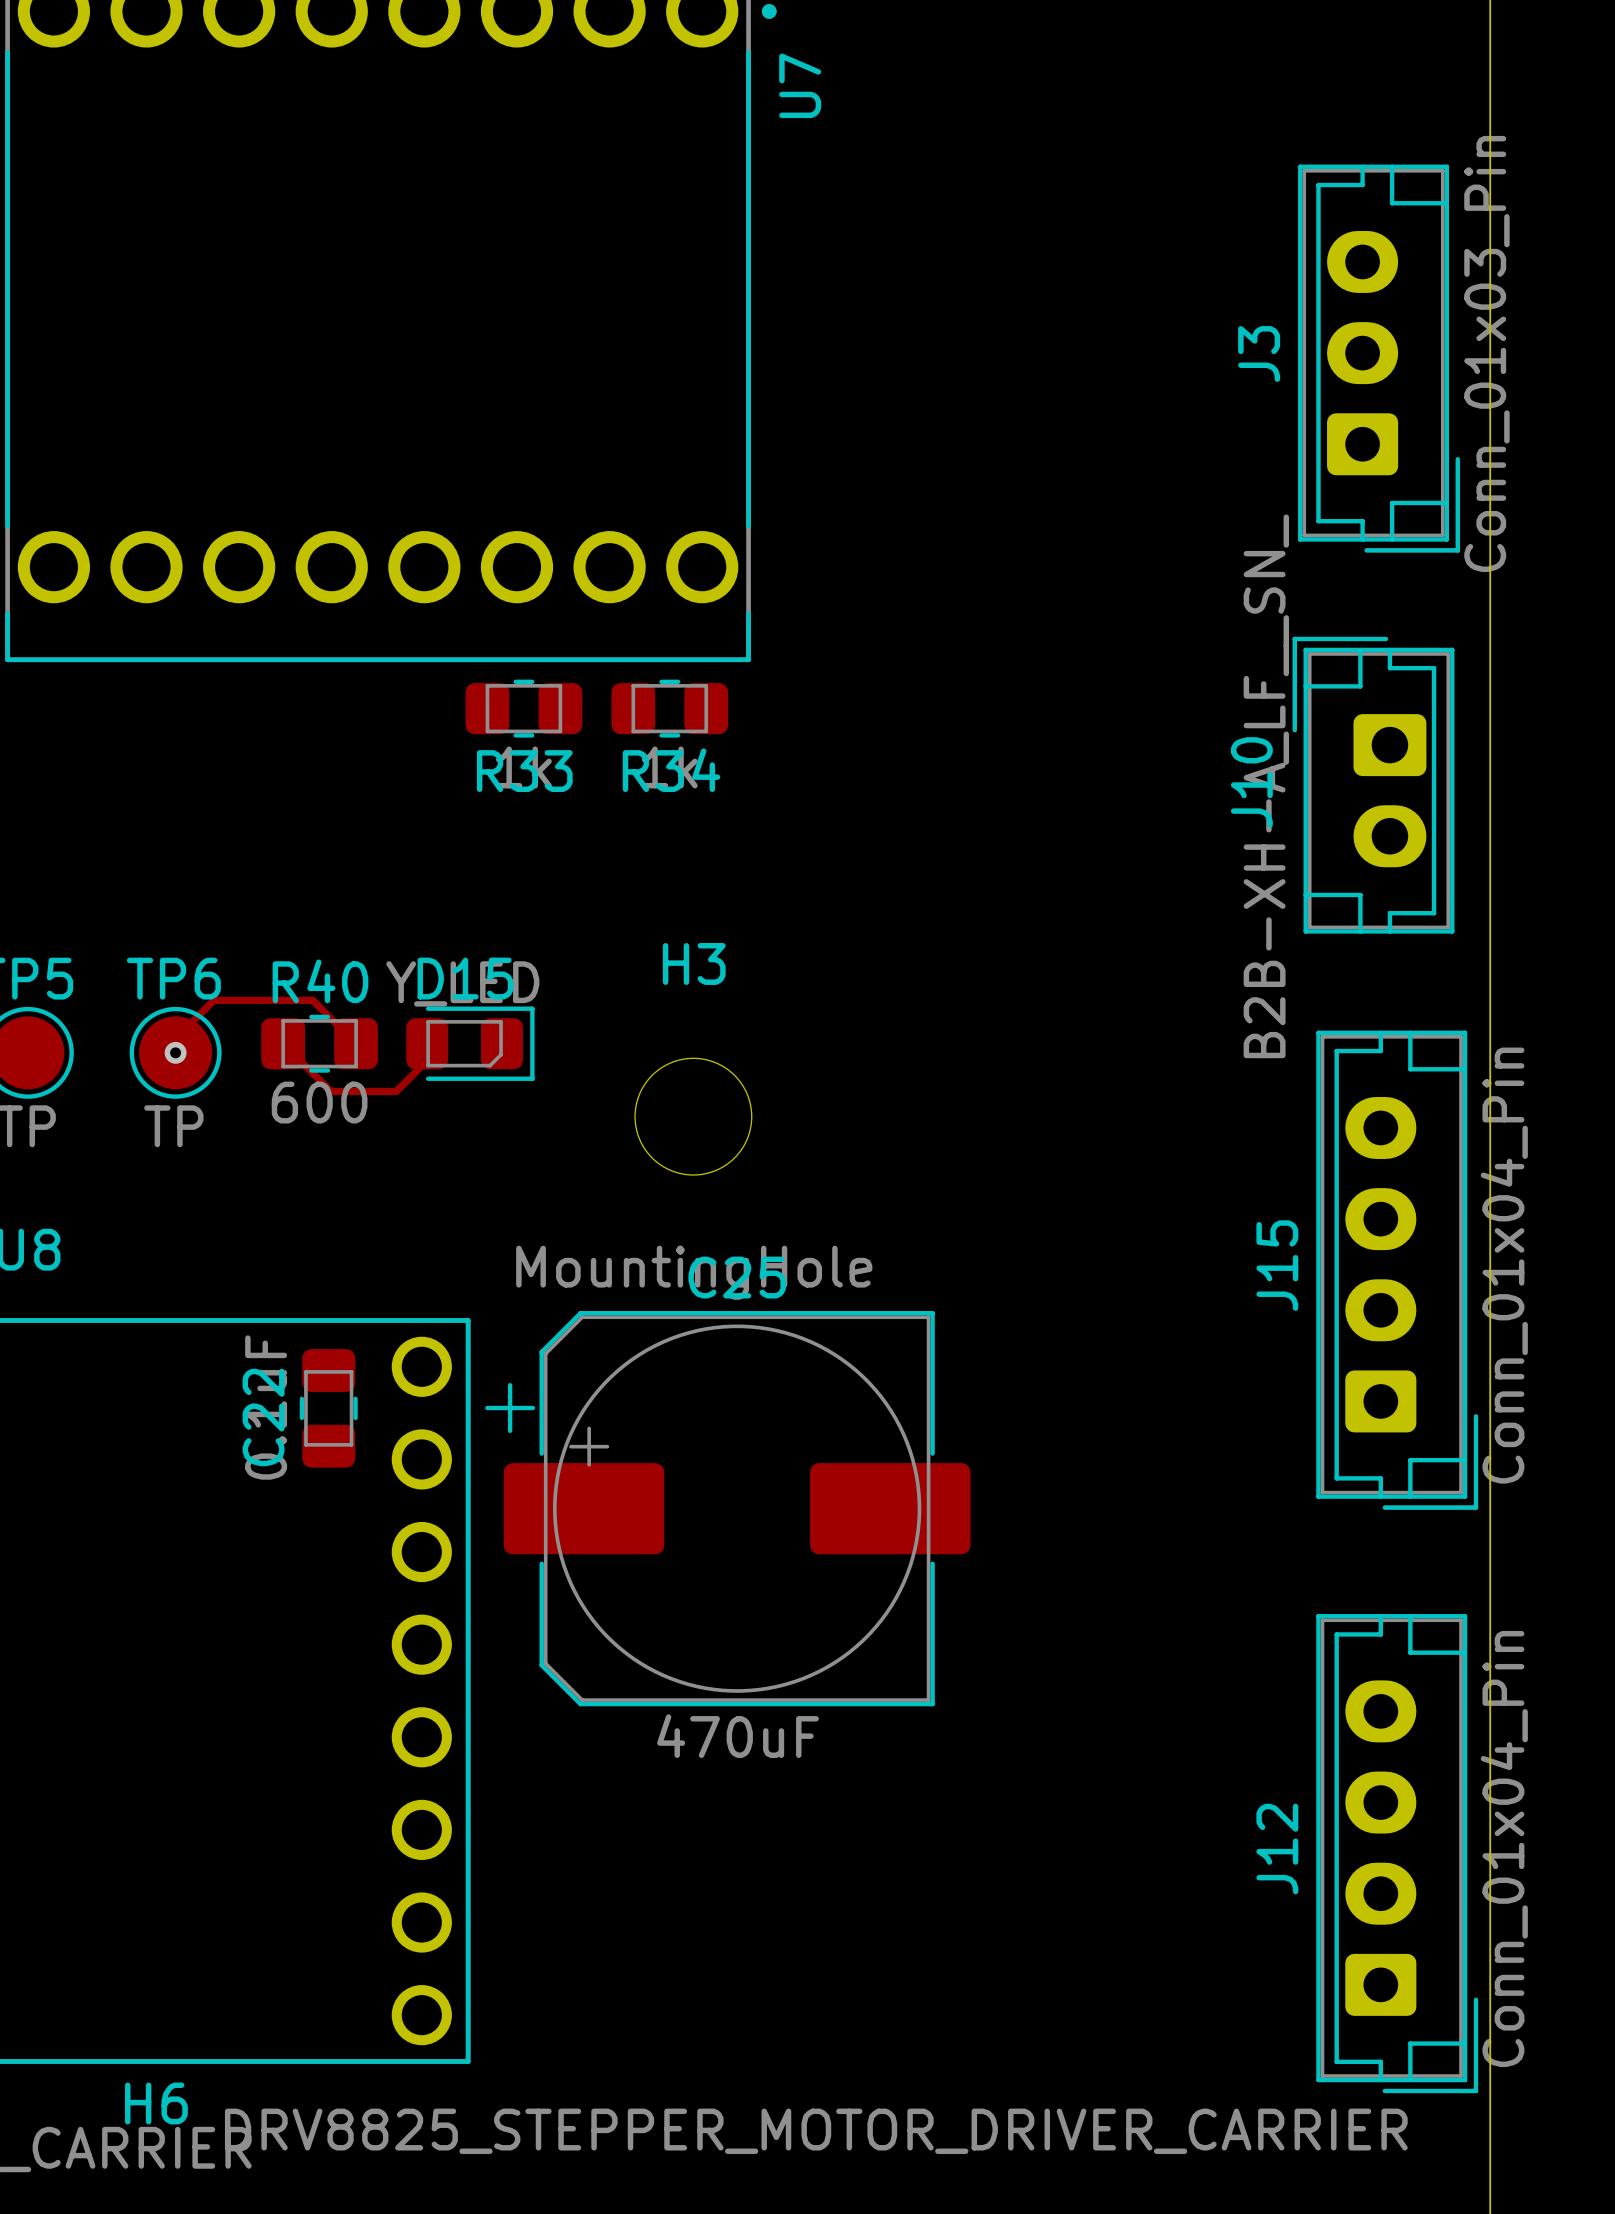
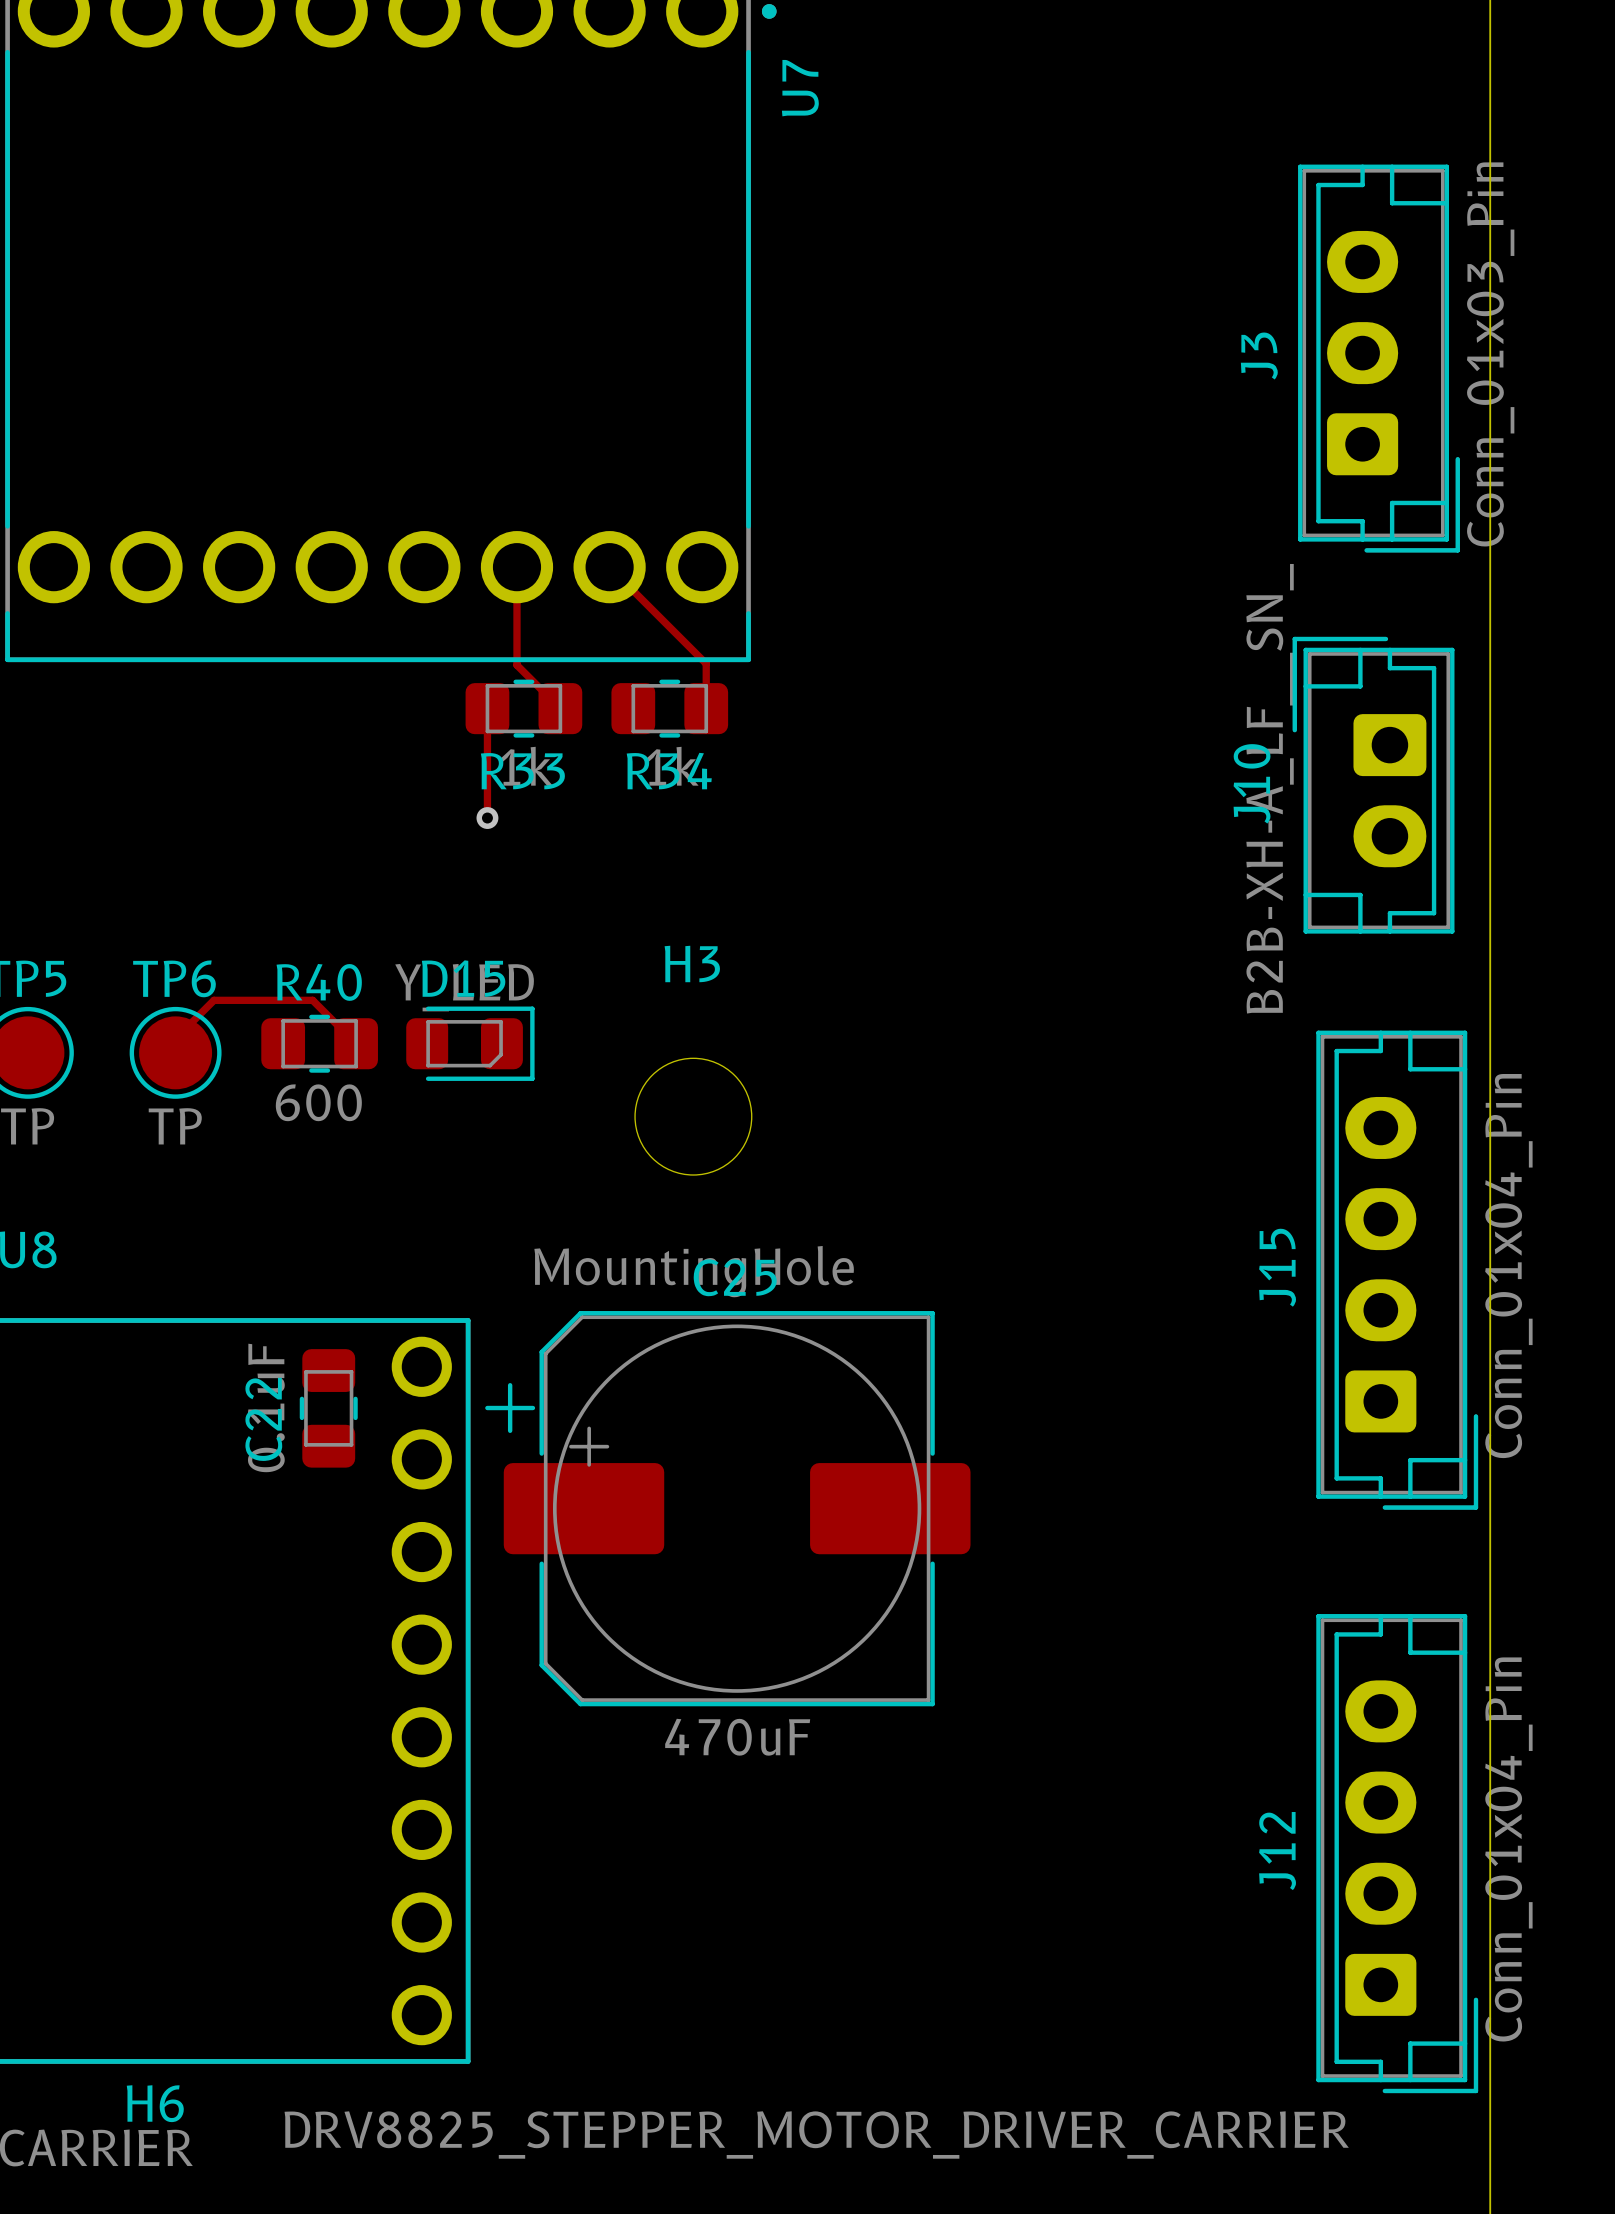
track: none -> (516, 567) (516, 665) (560, 708)
track: none -> (609, 567) (706, 663) (706, 708)
track: none -> (487, 708) (487, 818)
via: none -> (487, 818)
track: (283, 1043) (330, 1091) (396, 1091) (427, 1060) (427, 1043) -> none
via: (175, 1052) -> none

